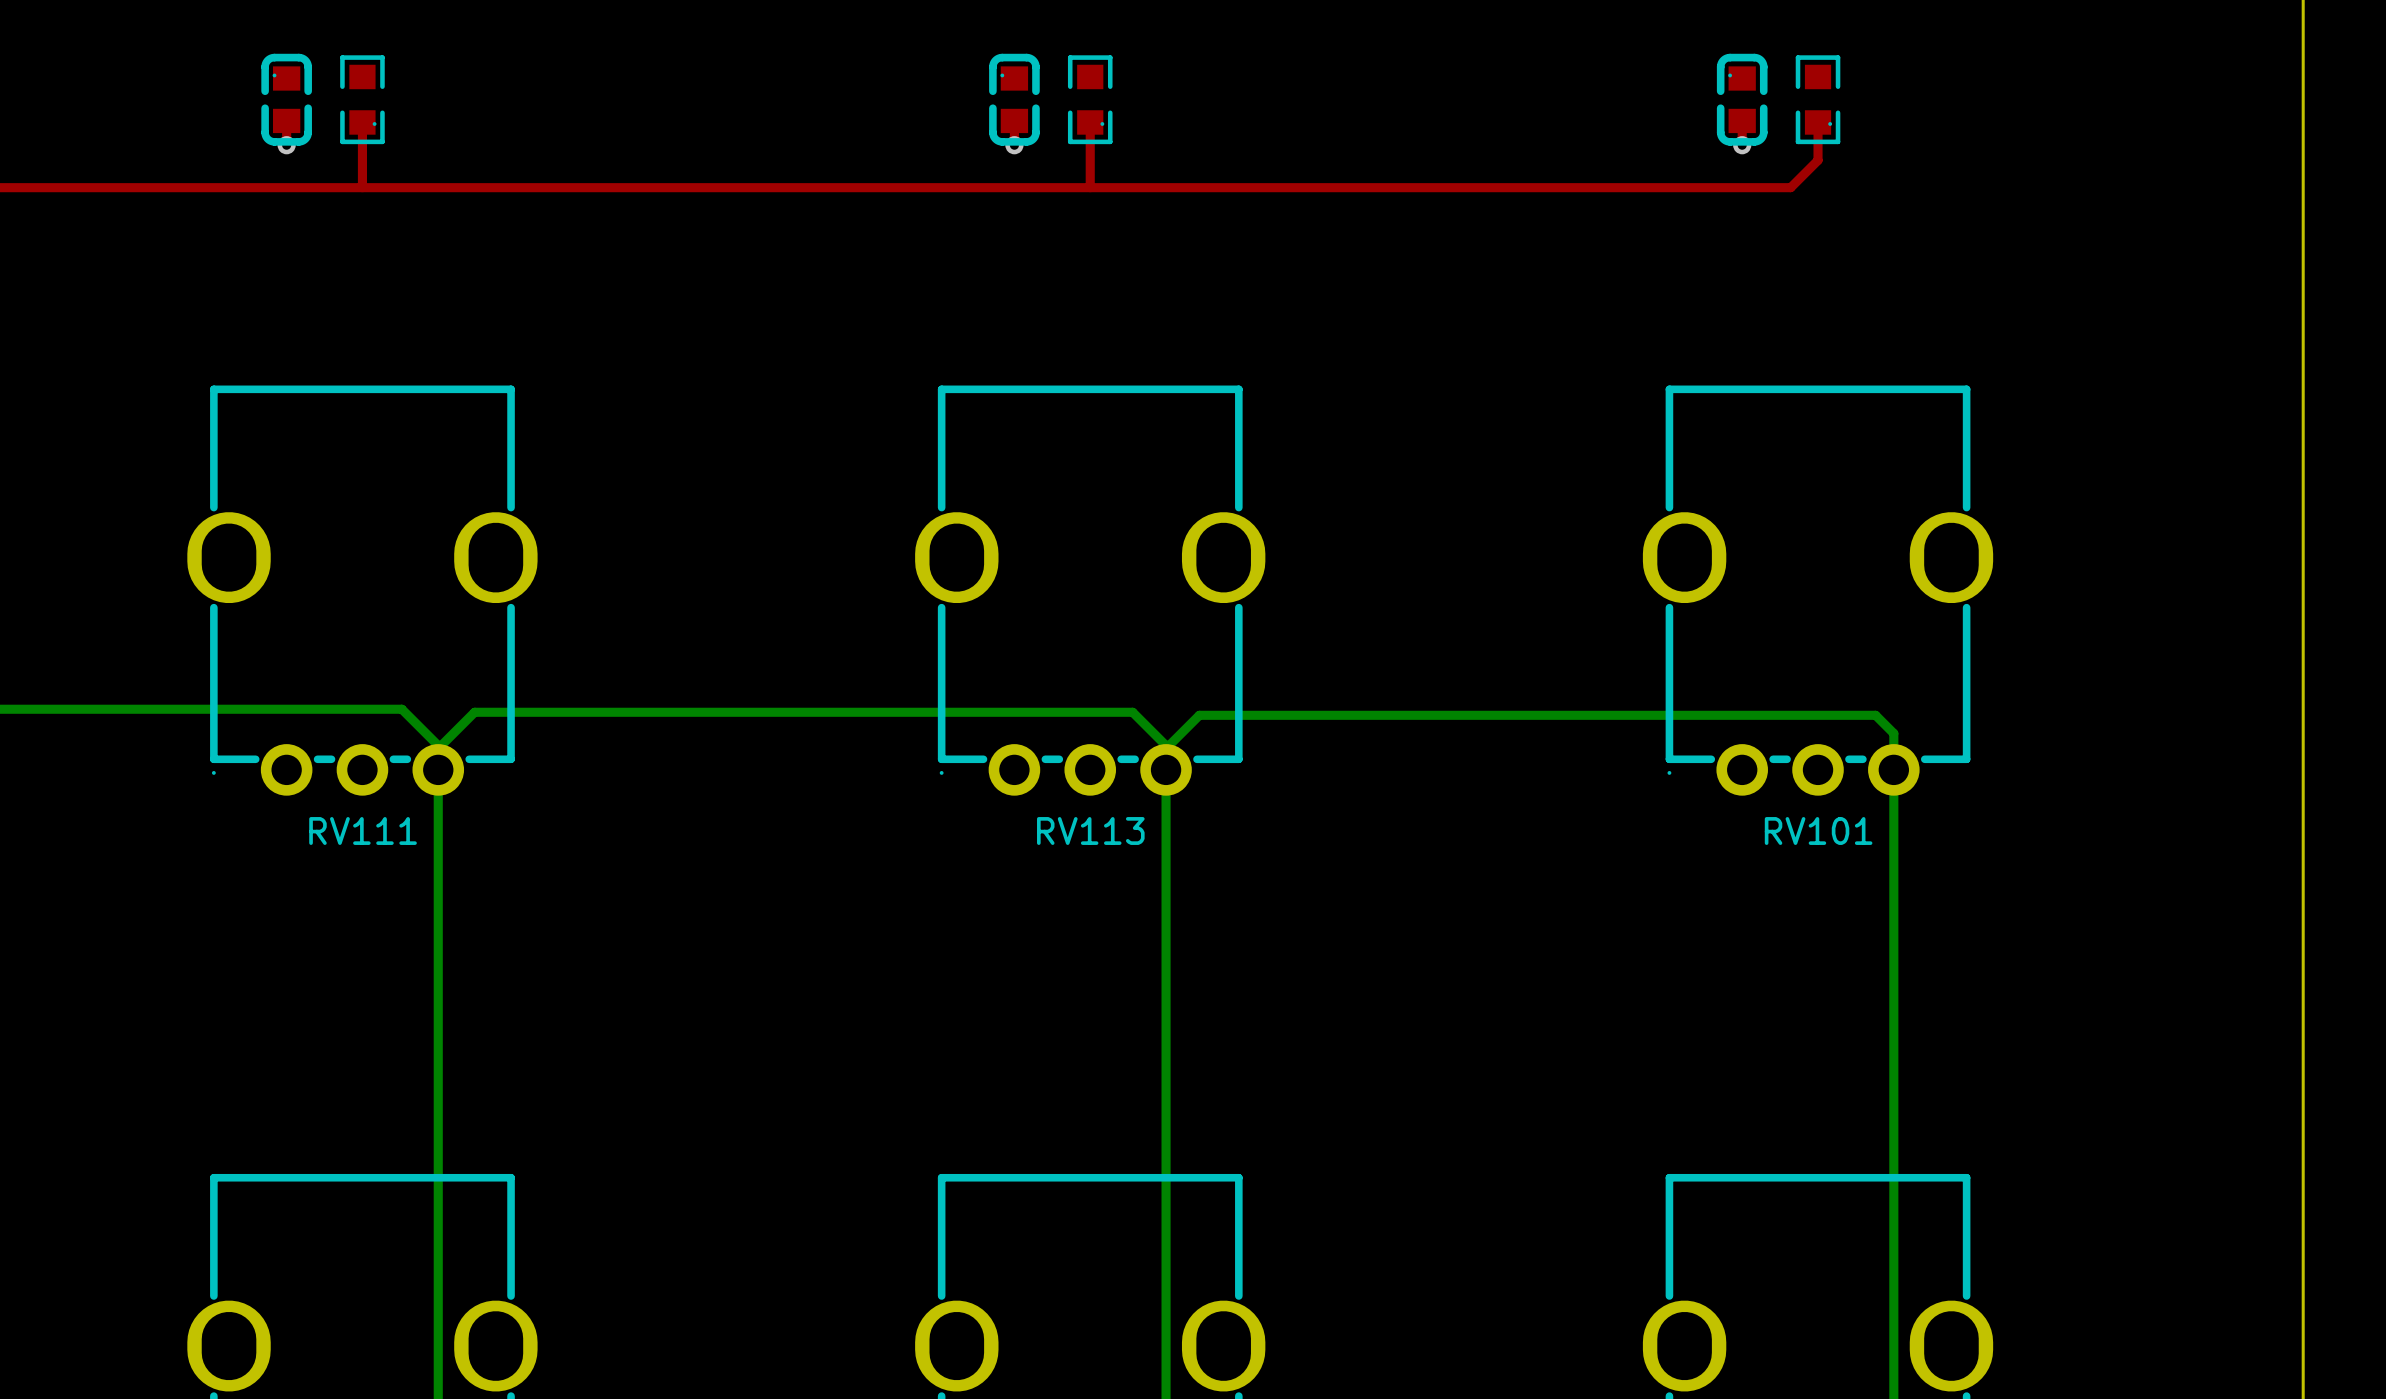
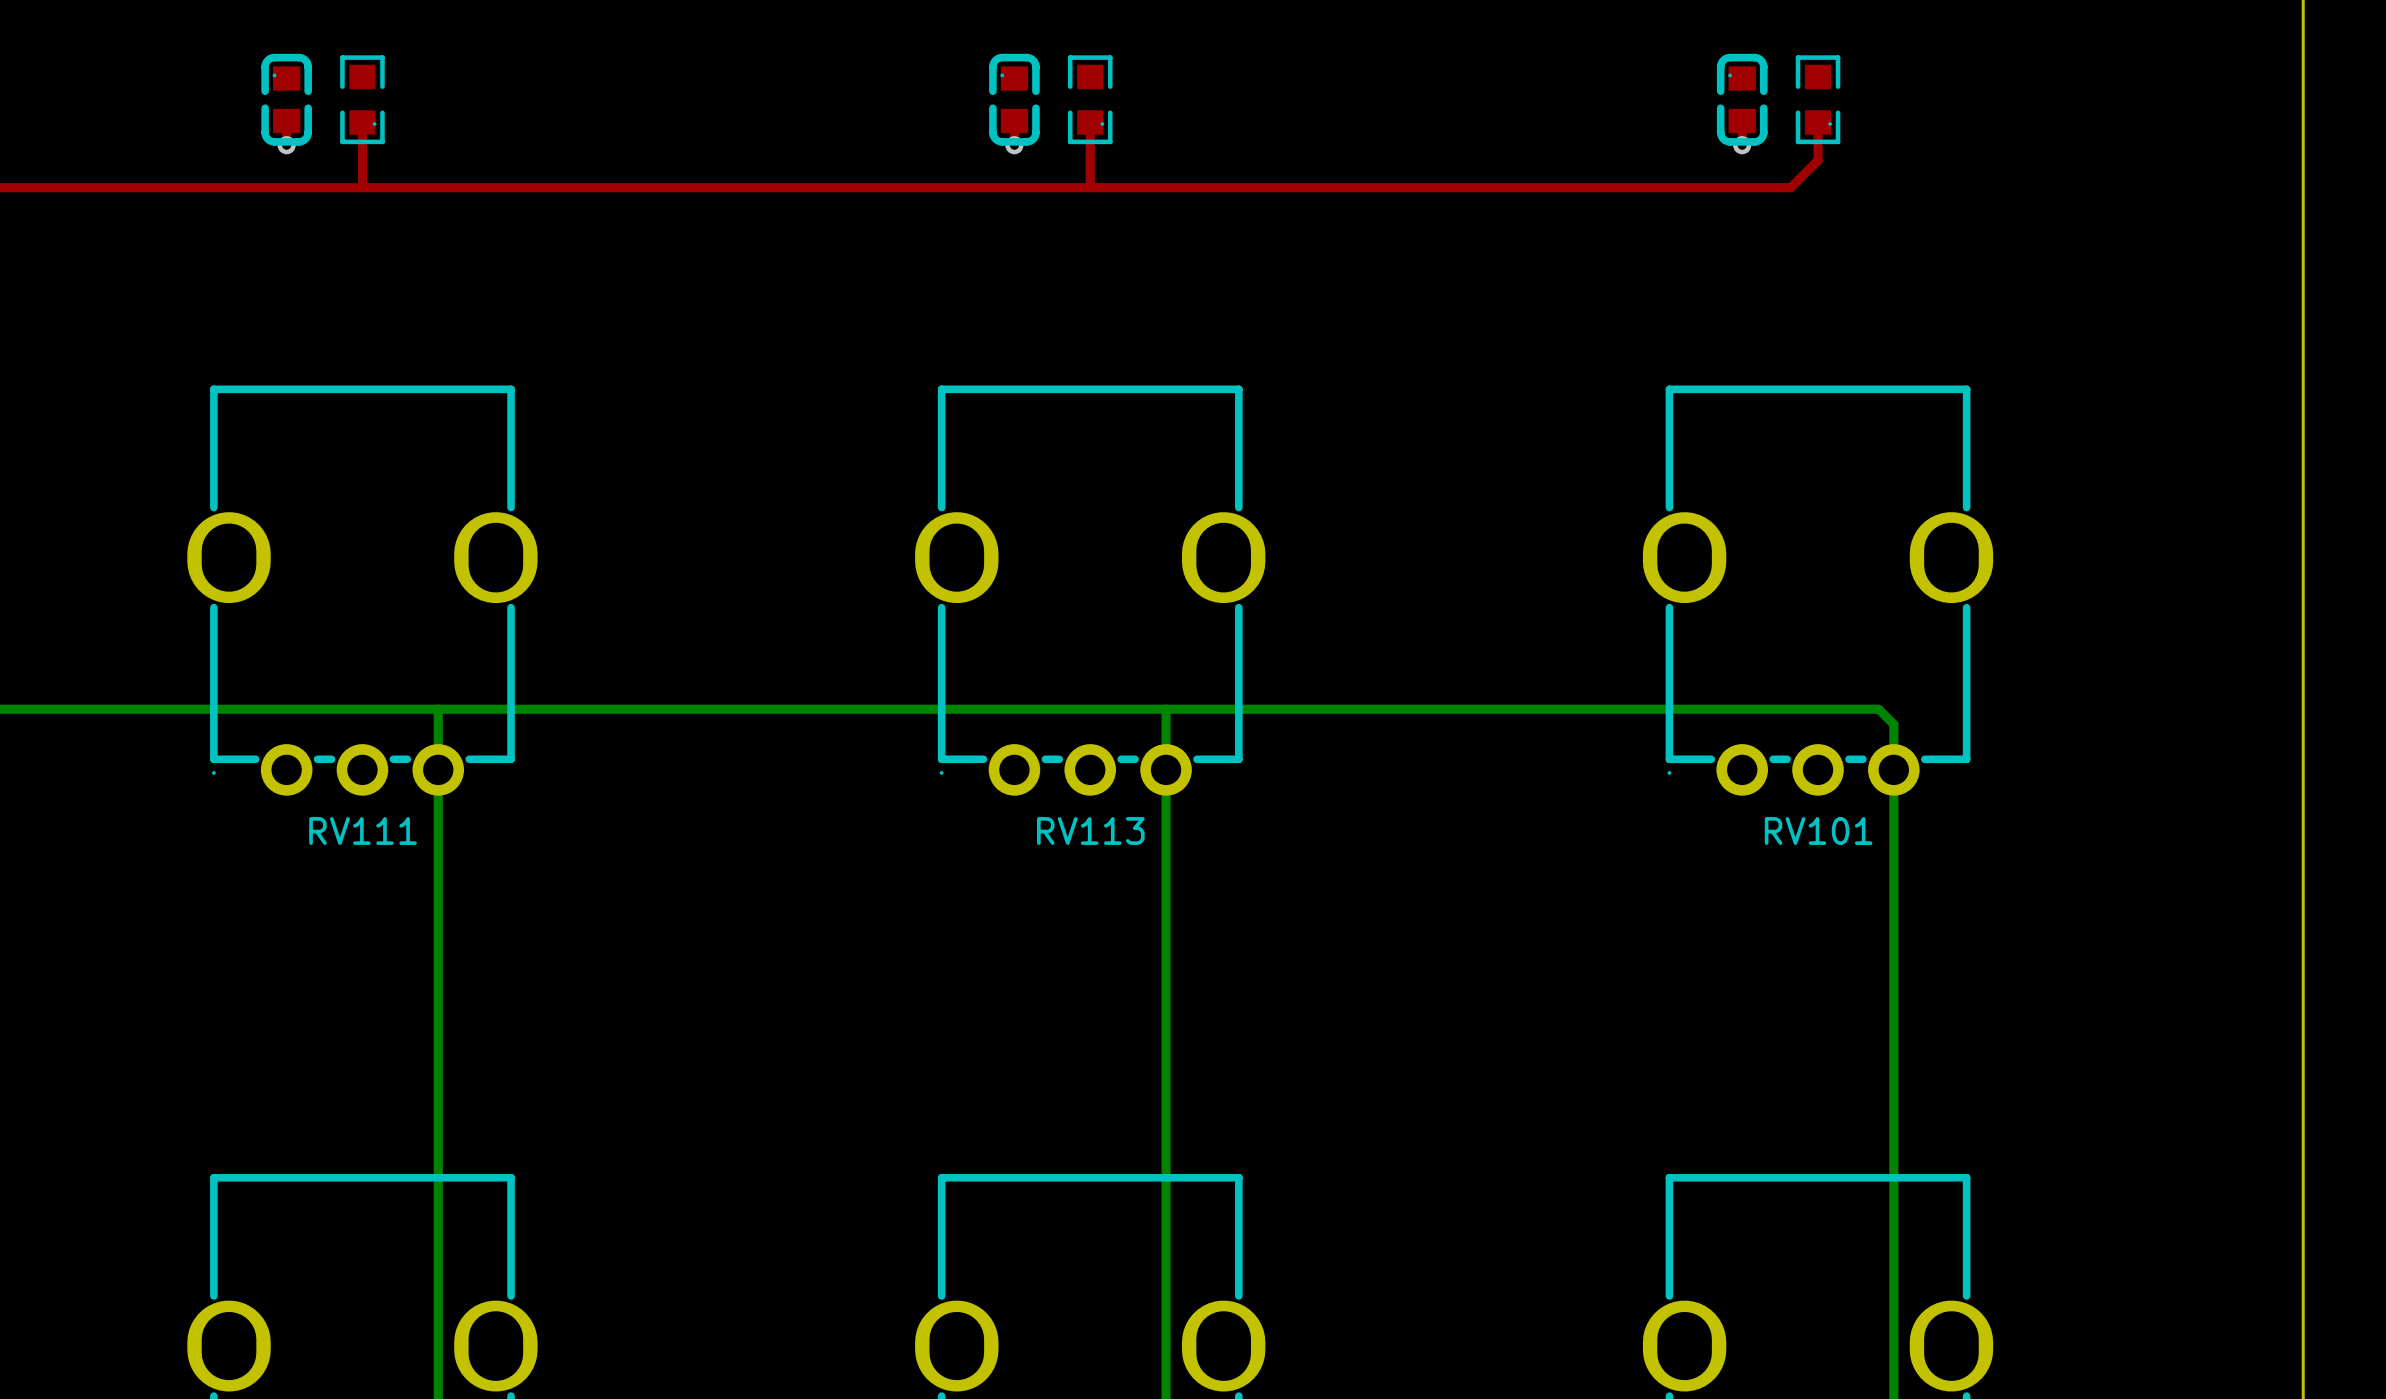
bottom track: (401, 709) (438, 745) -> (438, 709) (438, 745)
bottom track: (1893, 733) (1875, 715) (1199, 715) (1166, 748) -> (1893, 733) (1893, 724) (1878, 709) (401, 709)
bottom track: (1166, 745) (1132, 712) (474, 712) (438, 748) -> (1166, 745) (1166, 709)

